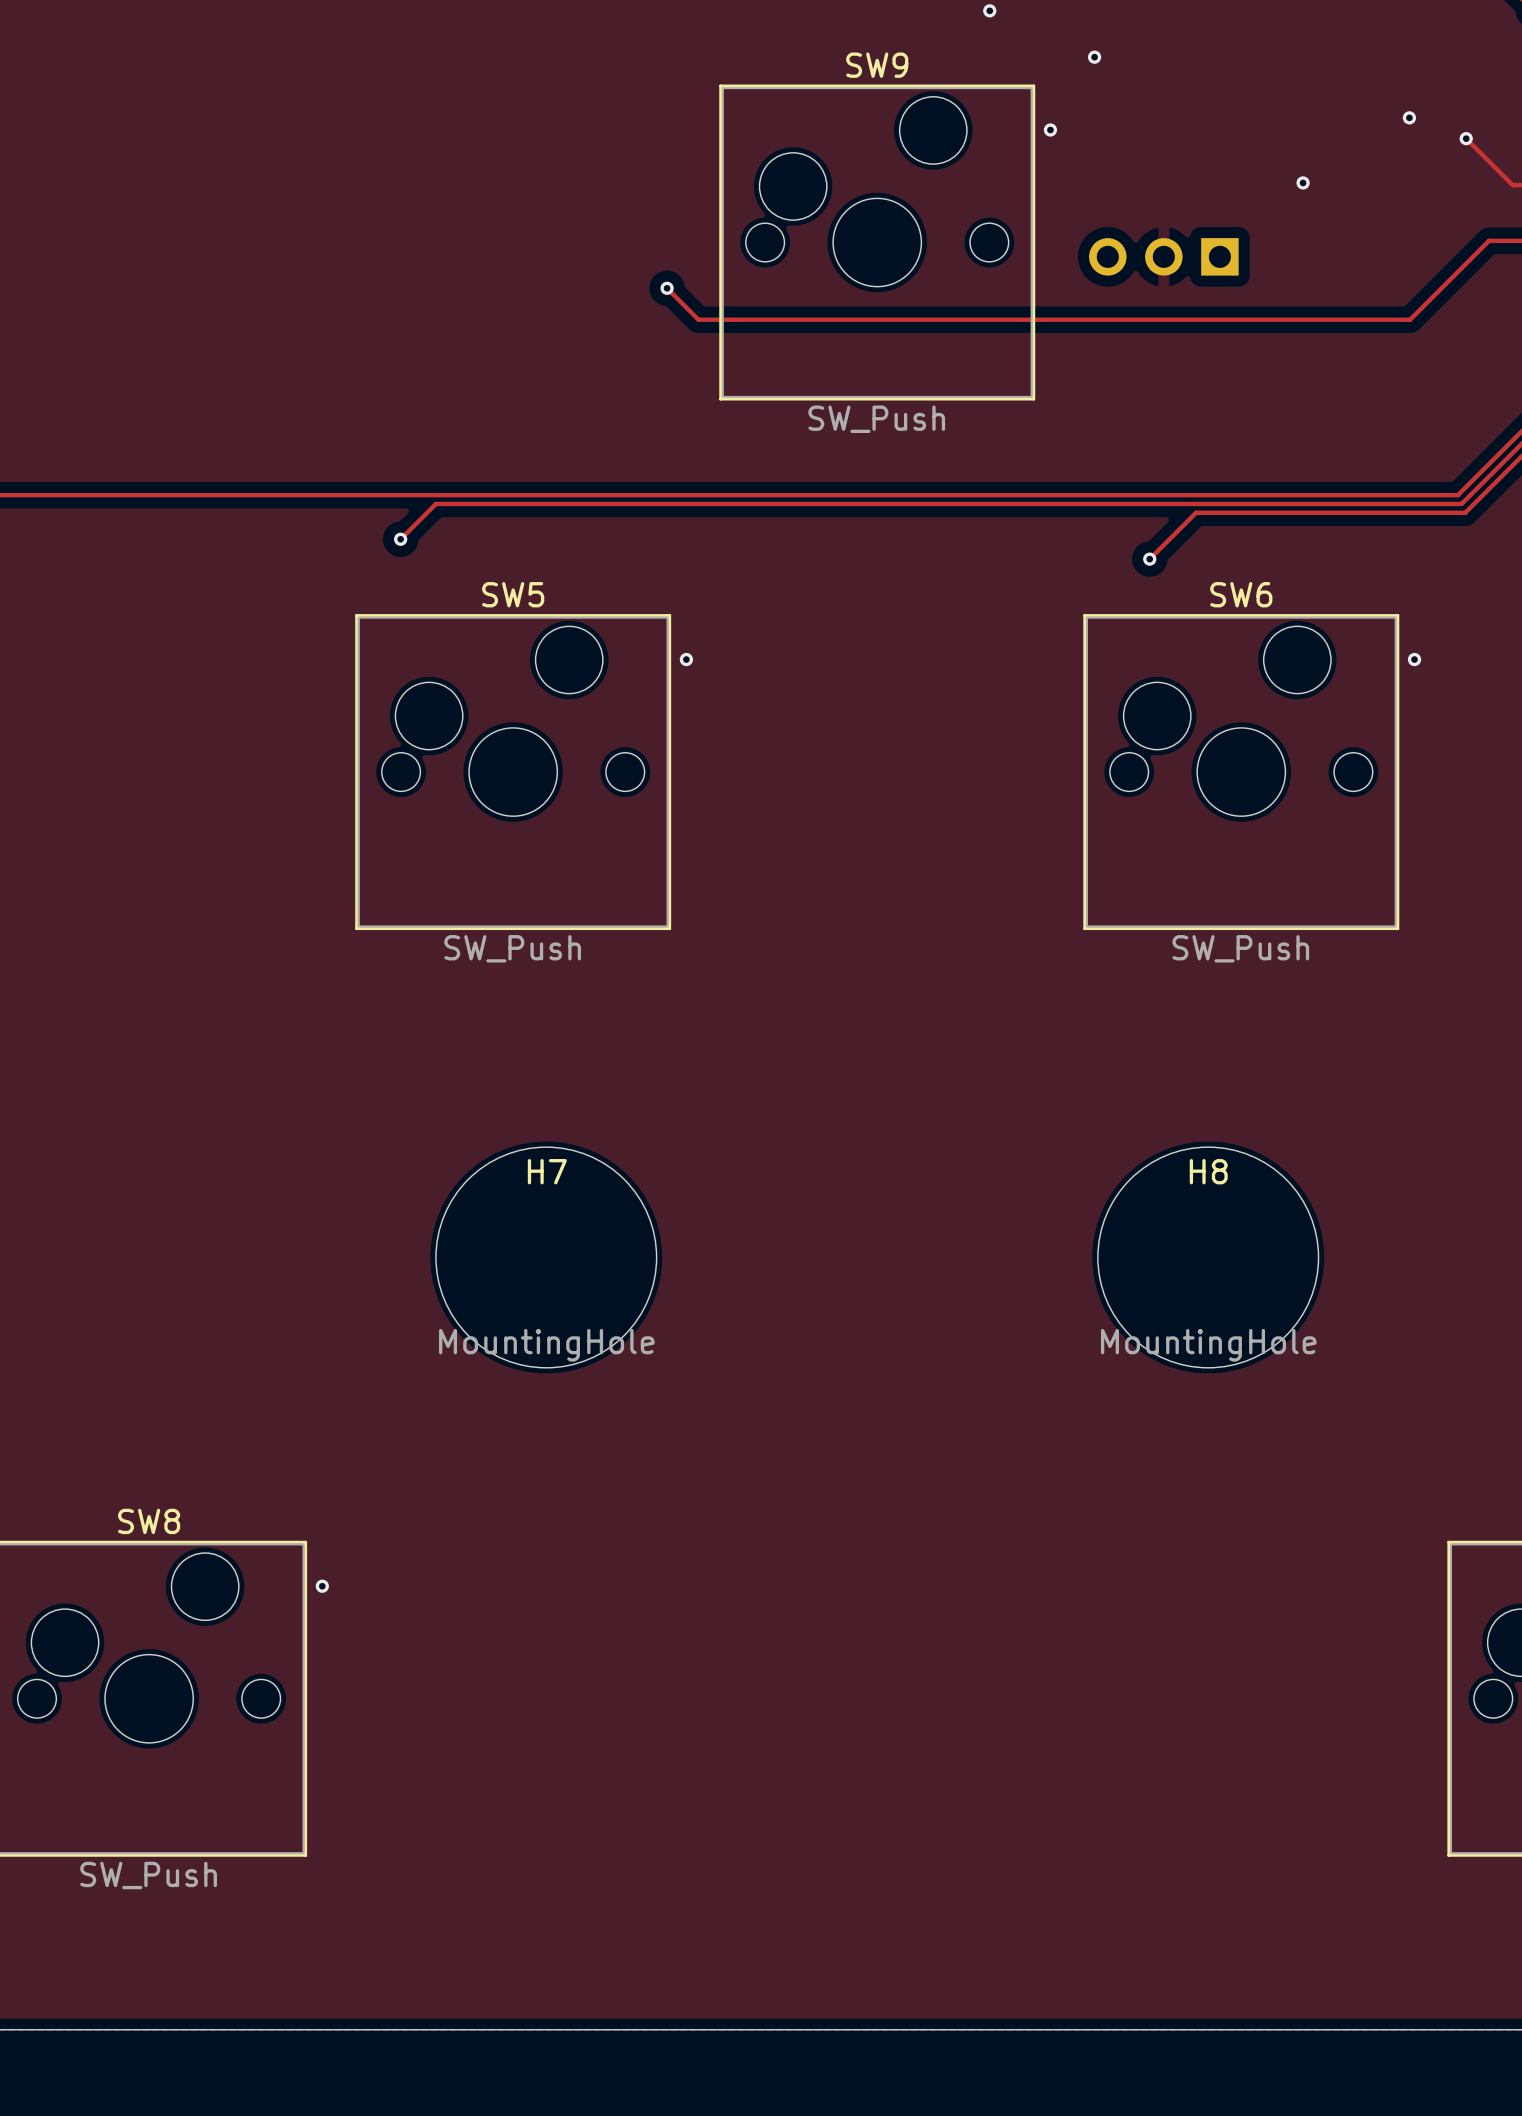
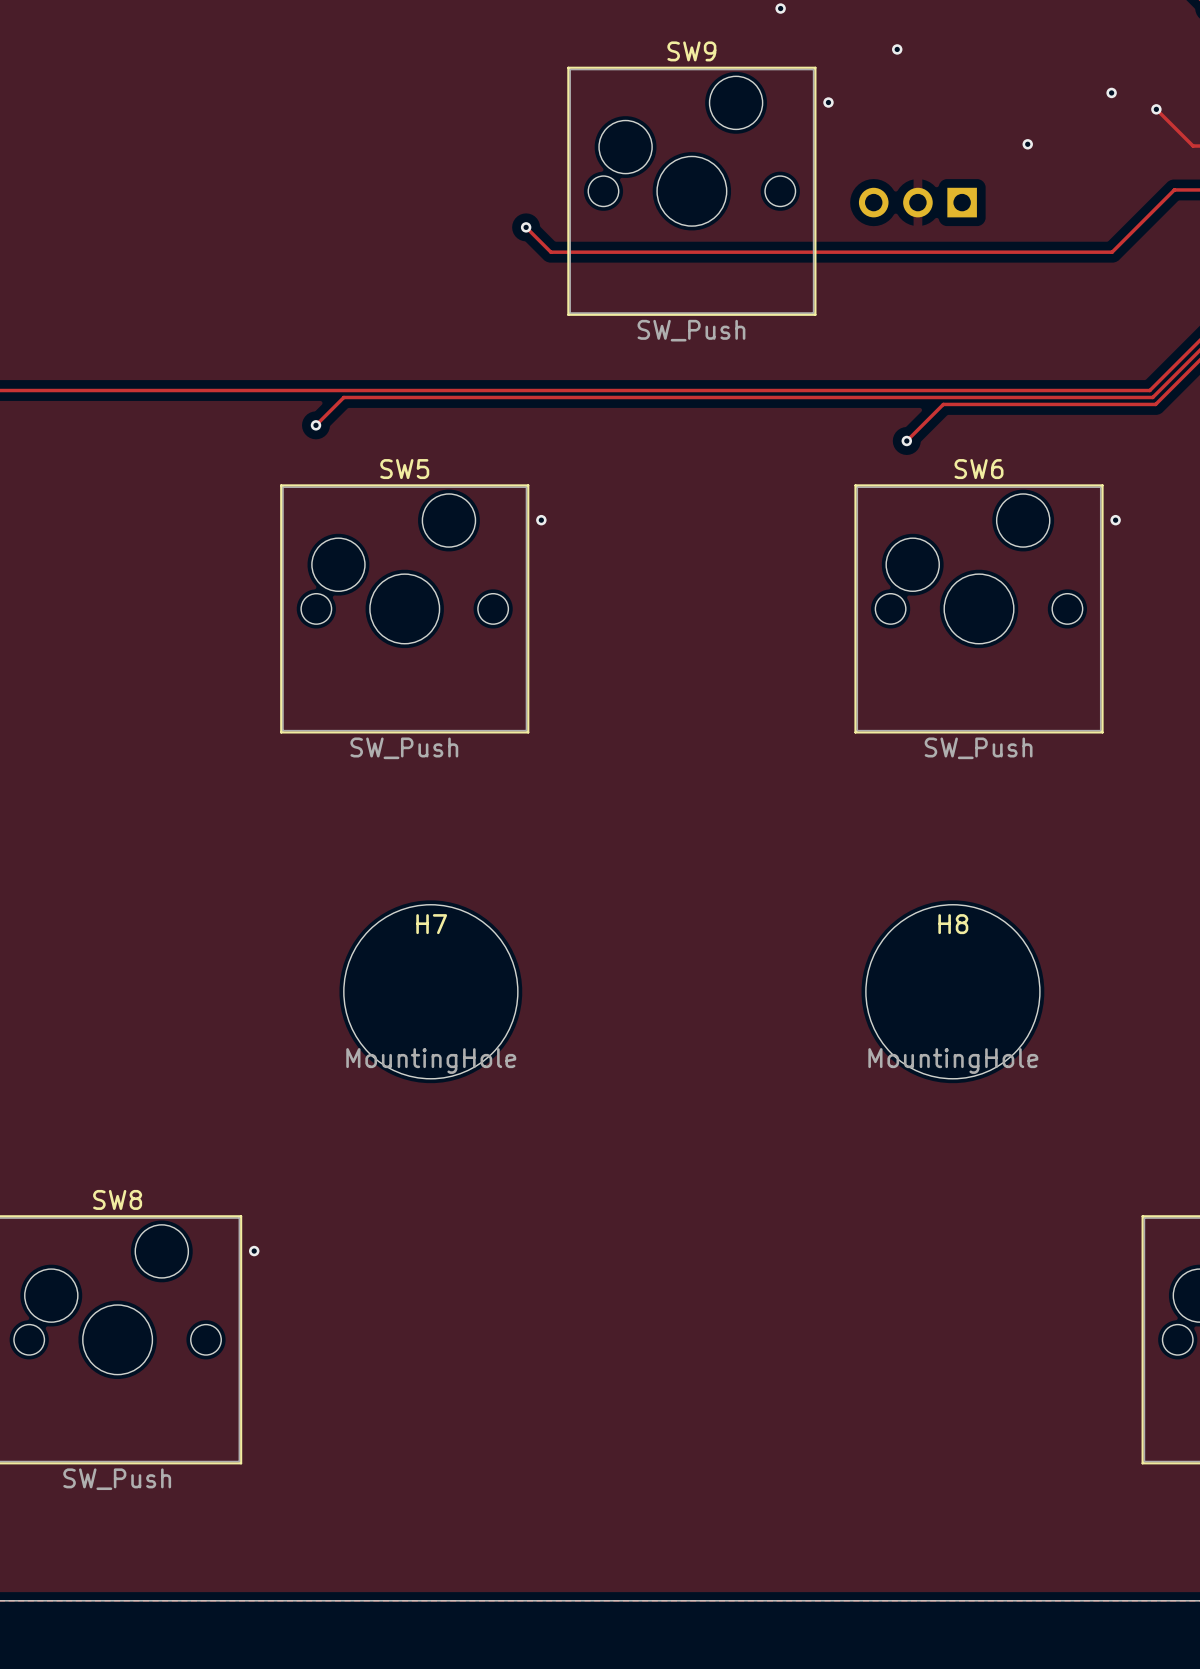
via position: (1094, 57) -> (897, 49)

